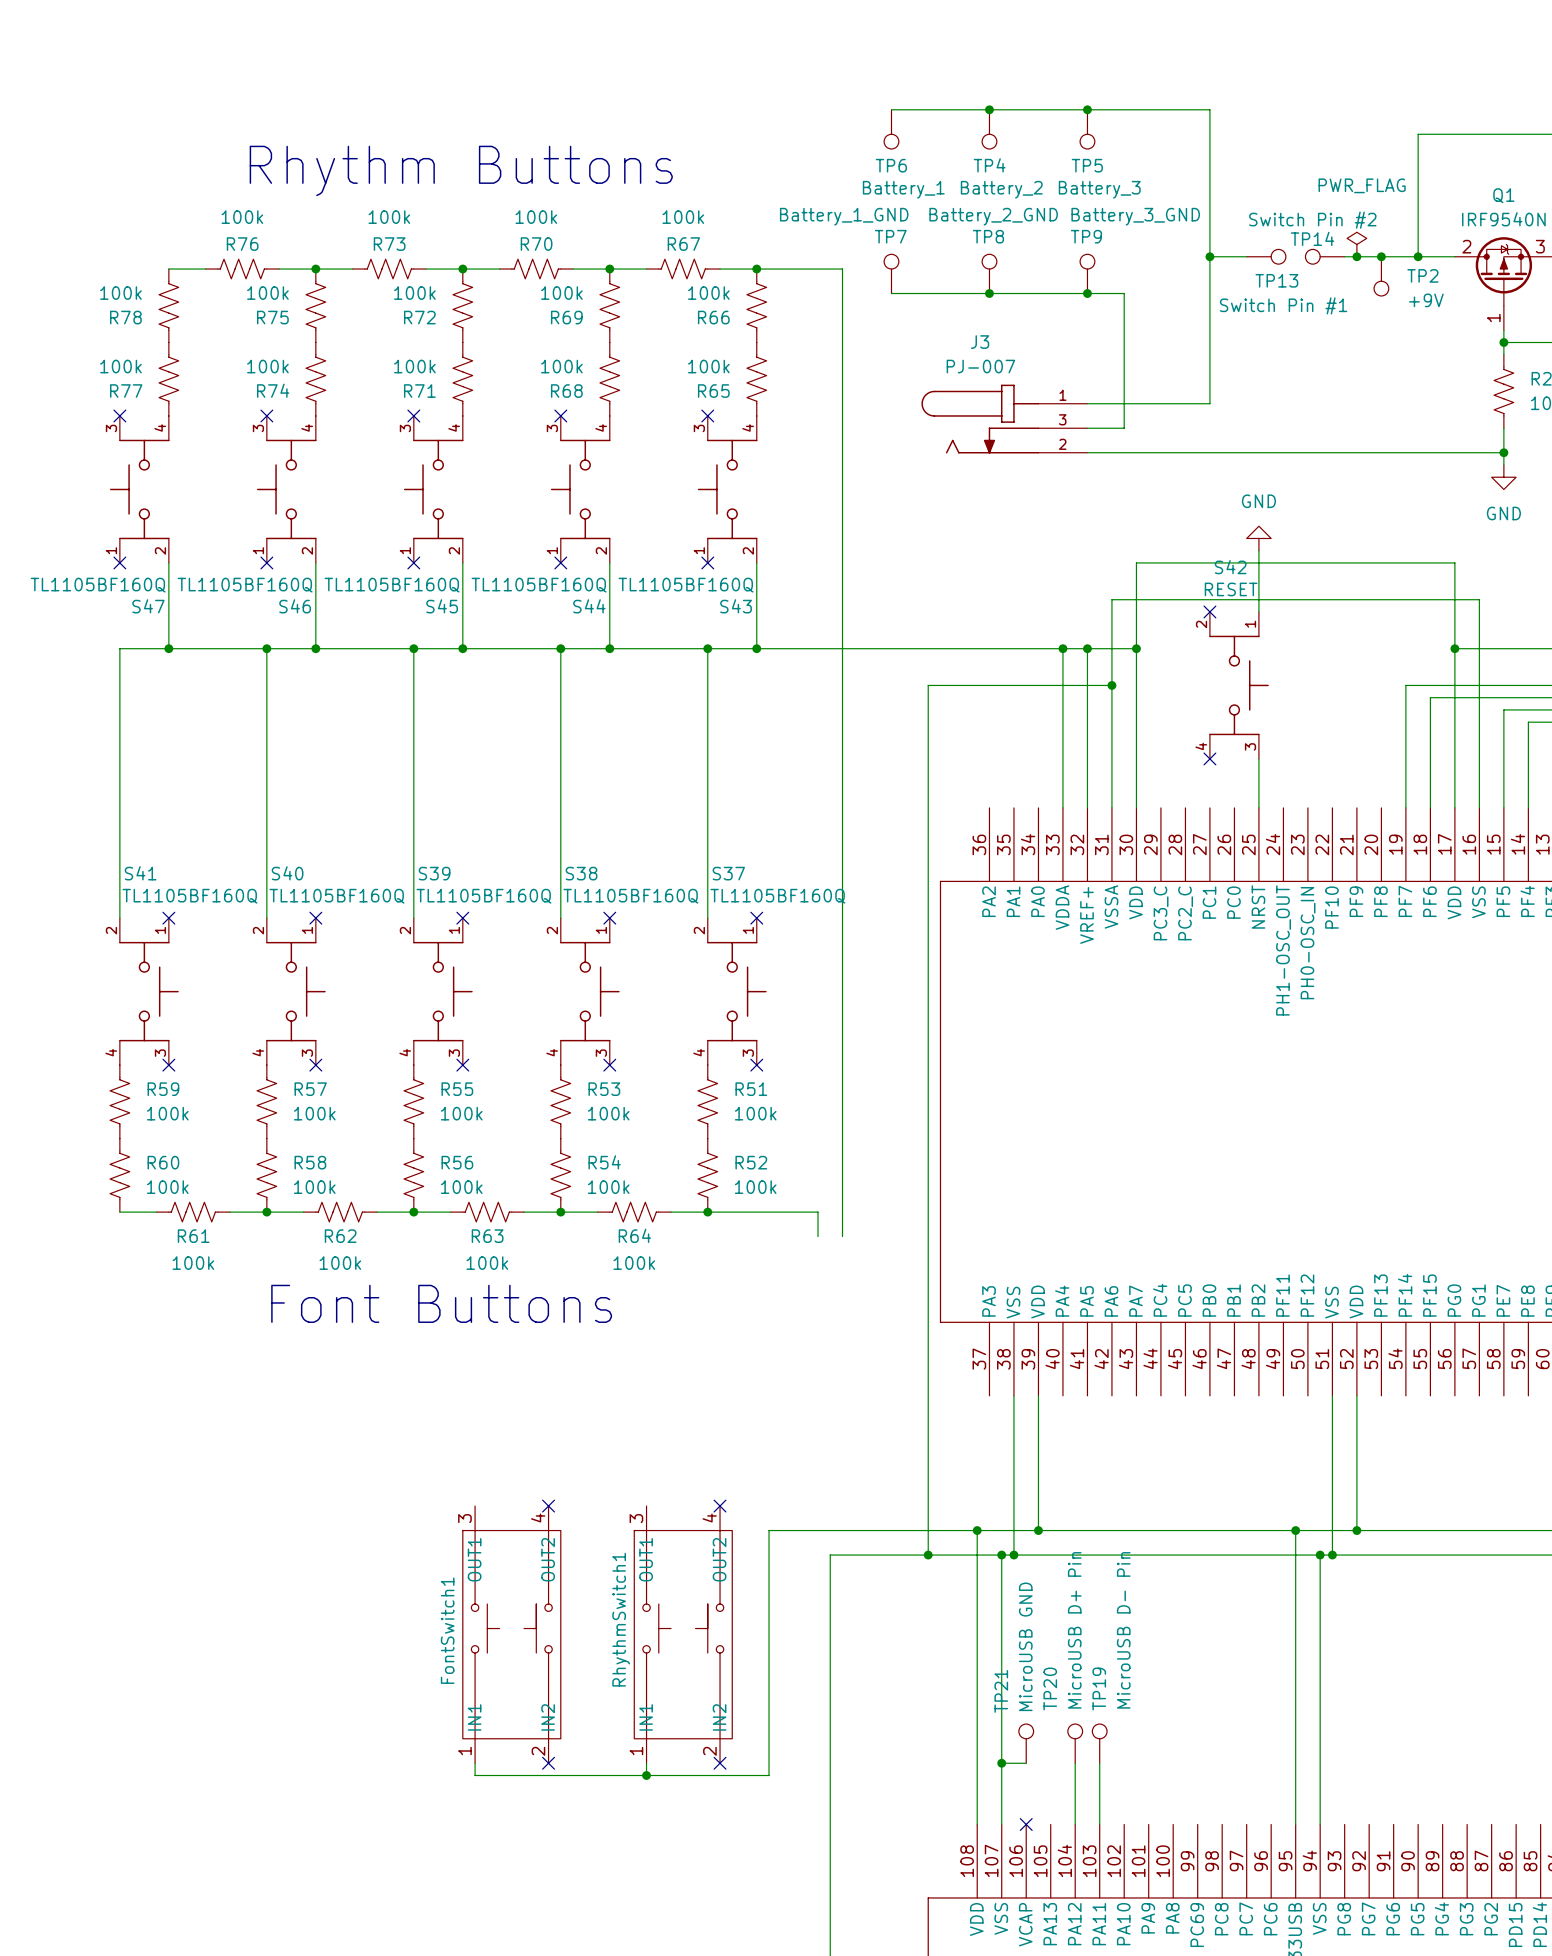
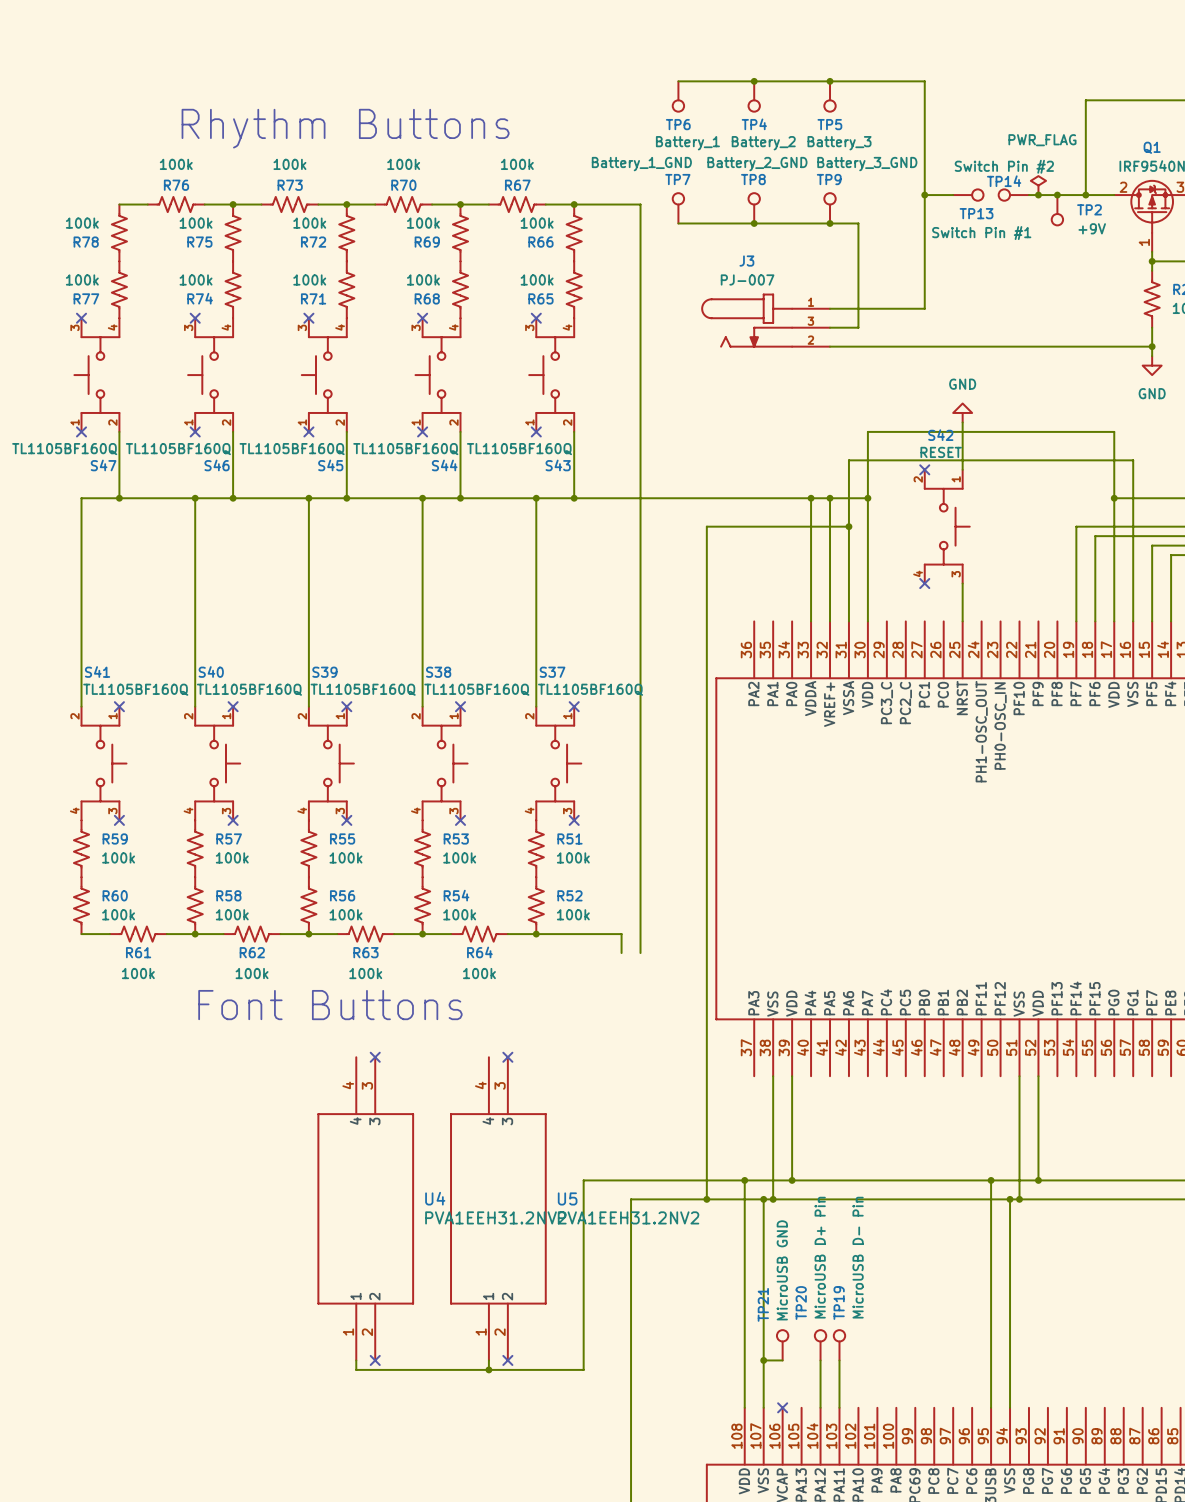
no-connect mark: none -> (375, 1057)
no-connect mark: none -> (507, 1057)
no-connect mark: (548, 1506) -> none
no-connect mark: (720, 1506) -> none
U4: none -> PVA1EEH31.2NV2 (365, 1208)
U5: none -> PVA1EEH31.2NV2 (498, 1208)
FontSwitch1: (511, 1634) -> none
RhythmSwitch1: (683, 1634) -> none
no-connect mark position: (548, 1763) -> (375, 1360)
no-connect mark position: (720, 1763) -> (507, 1360)

